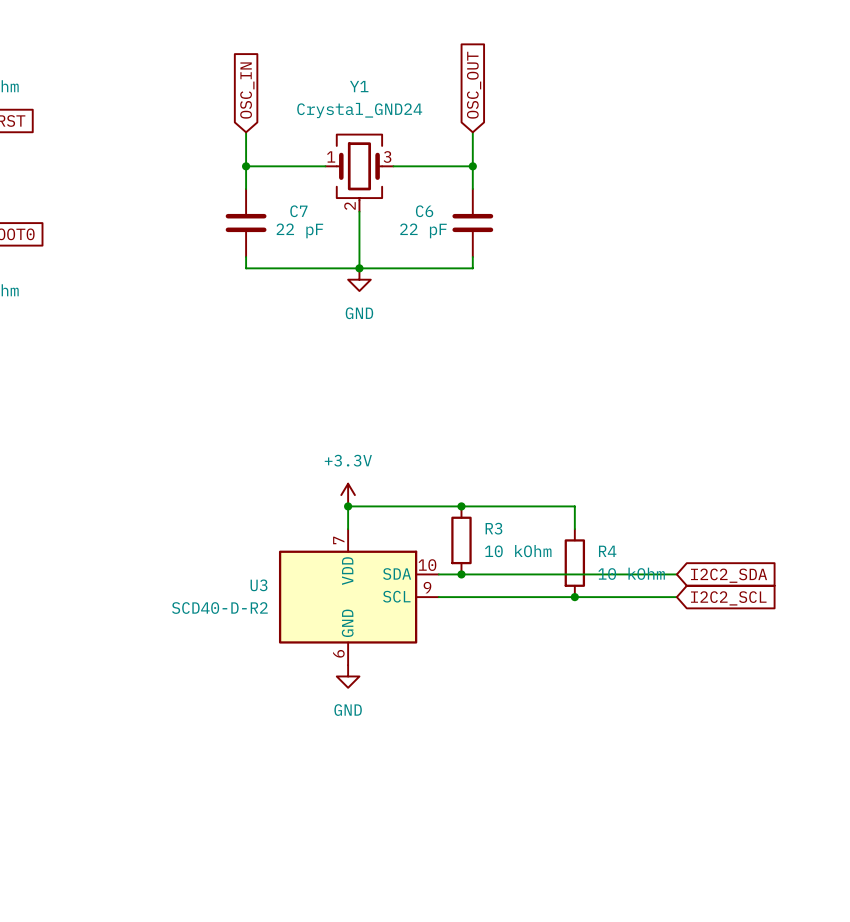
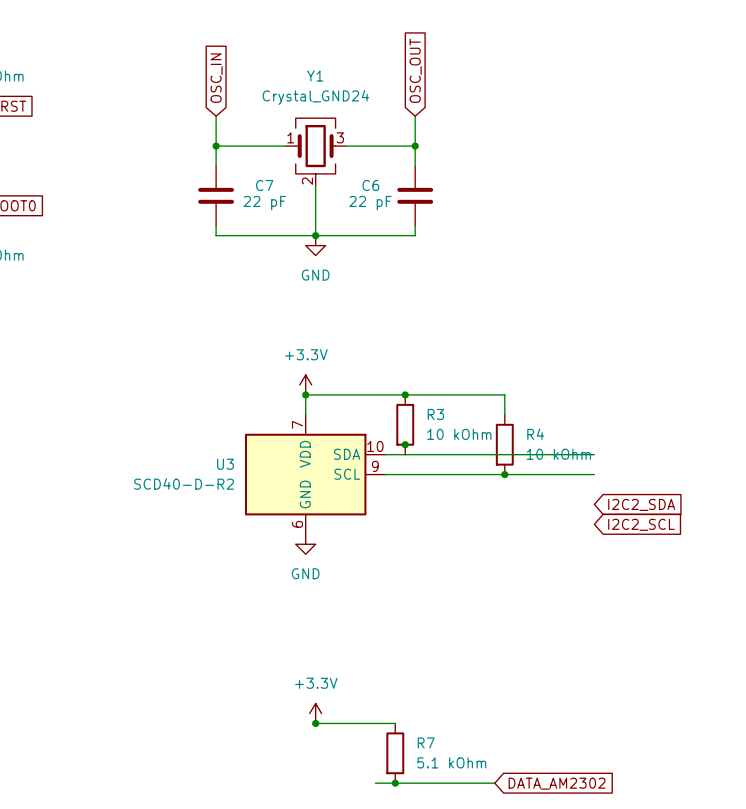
junction: none -> (305, 394)
junction: none -> (405, 394)
power symbol position: +3.3V (348, 495) -> +3.3V (305, 384)
junction: (348, 506) -> none
wire: (348, 529) (348, 506) (574, 506) (574, 529) -> (305, 414) (305, 394) (504, 394) (504, 414)
R3 position: (461, 540) -> (405, 424)
junction: none -> (504, 474)
R4 position: (574, 563) -> (504, 444)
wire: (438, 574) (676, 574) -> (385, 454) (594, 454)
junction: (461, 574) -> none
U3 position: (358, 597) -> (315, 474)
wire: (438, 597) (676, 597) -> (385, 474) (594, 474)
junction: (574, 597) -> none
power symbol position: GND (348, 676) -> GND (305, 544)
power symbol: none -> +3.3V (315, 713)
wire: none -> (315, 723) (395, 723)
junction: none -> (315, 723)
R7: none -> 5.1 kOhm (395, 753)
wire: none -> (375, 783) (494, 783)
junction: none -> (395, 783)
global label: none -> DATA_AM2302 (557, 783)

